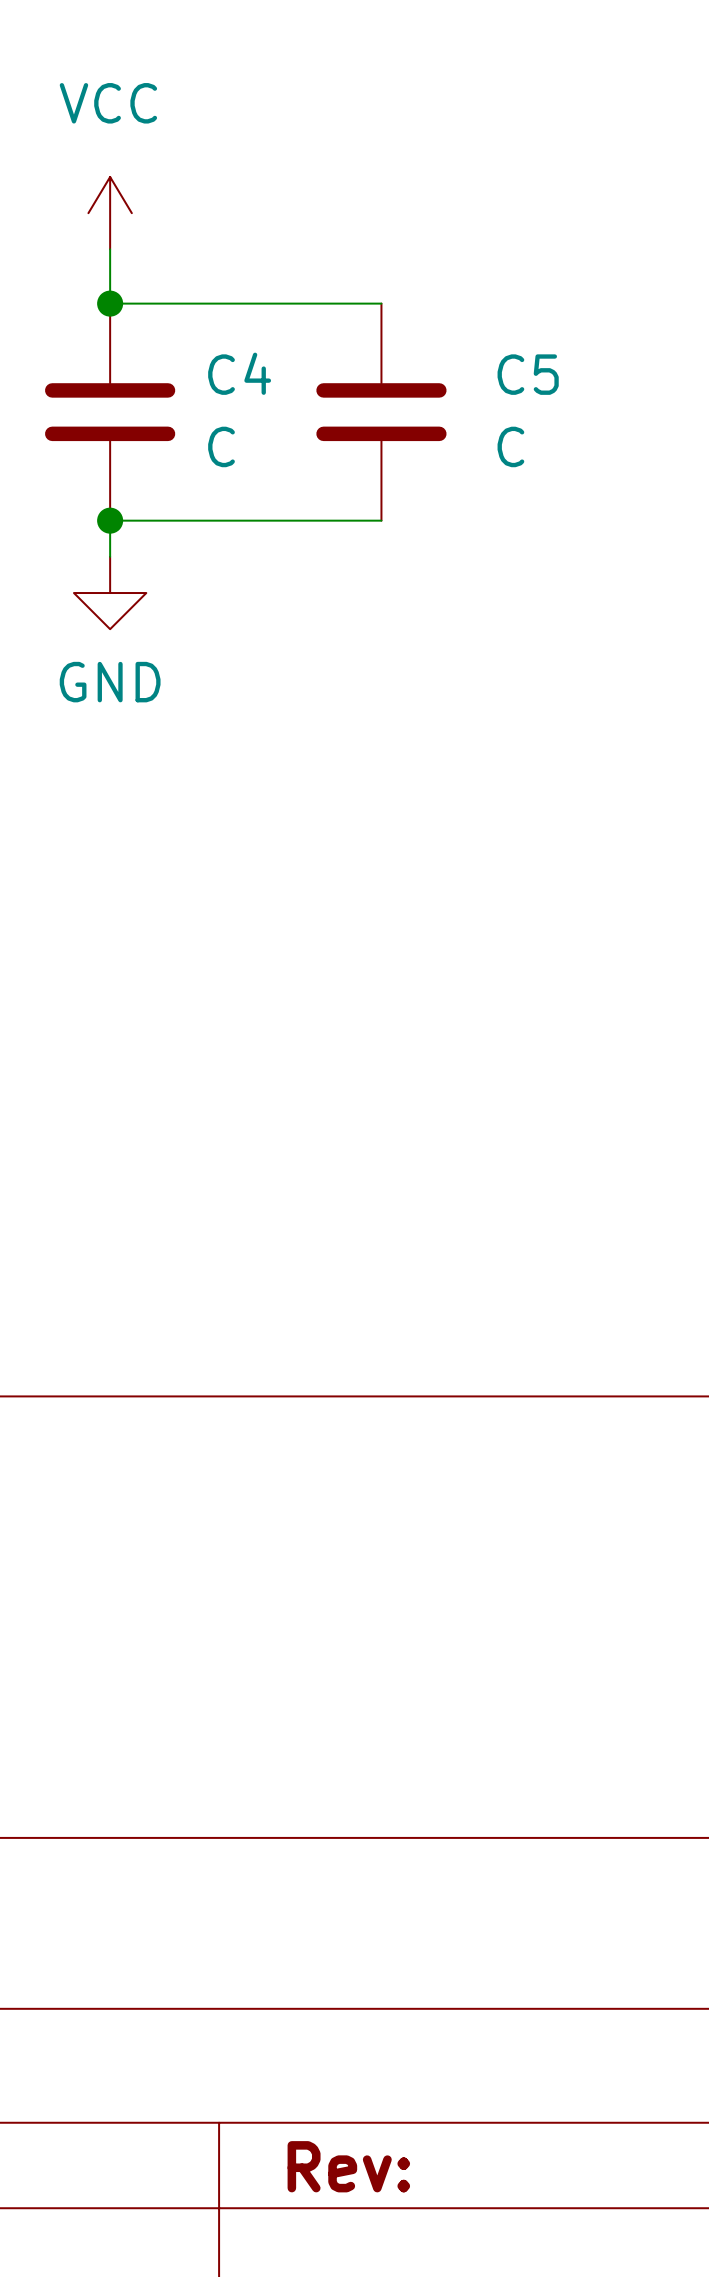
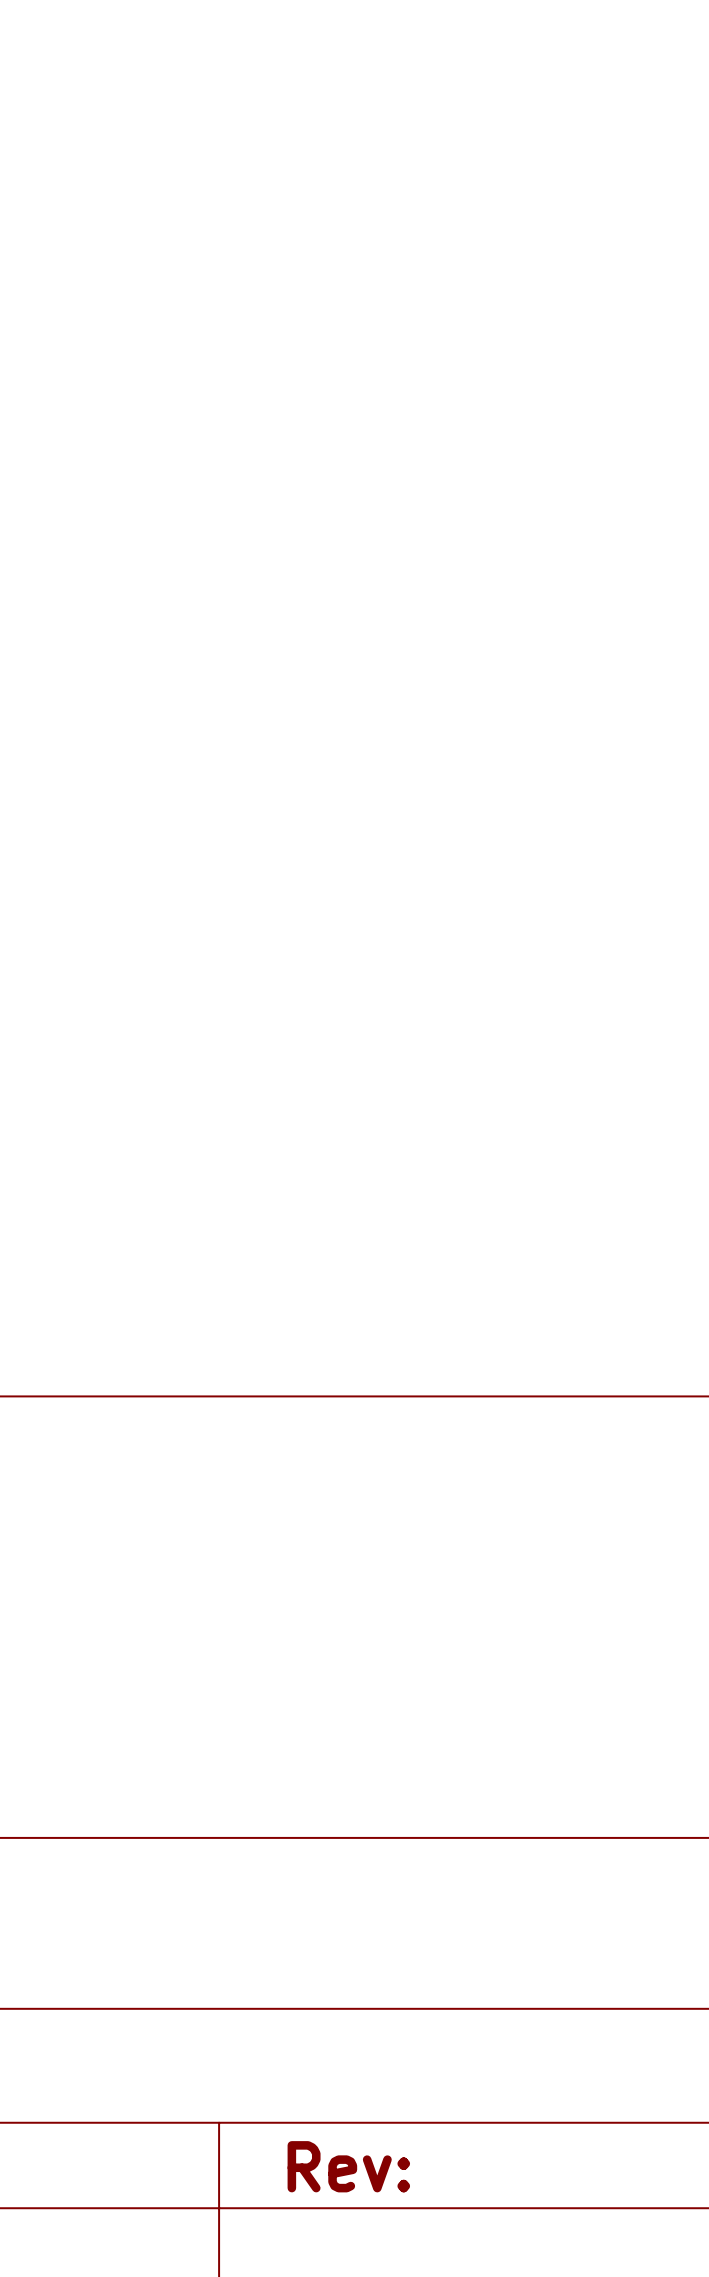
power symbol: VCC (110, 213) -> none
wire: (110, 249) (110, 303) (381, 303) -> none
junction: (110, 303) -> none
C4: C (110, 412) -> none
C5: C (381, 412) -> none
junction: (110, 520) -> none
wire: (381, 520) (110, 520) (110, 556) -> none
power symbol: GND (110, 593) -> none

